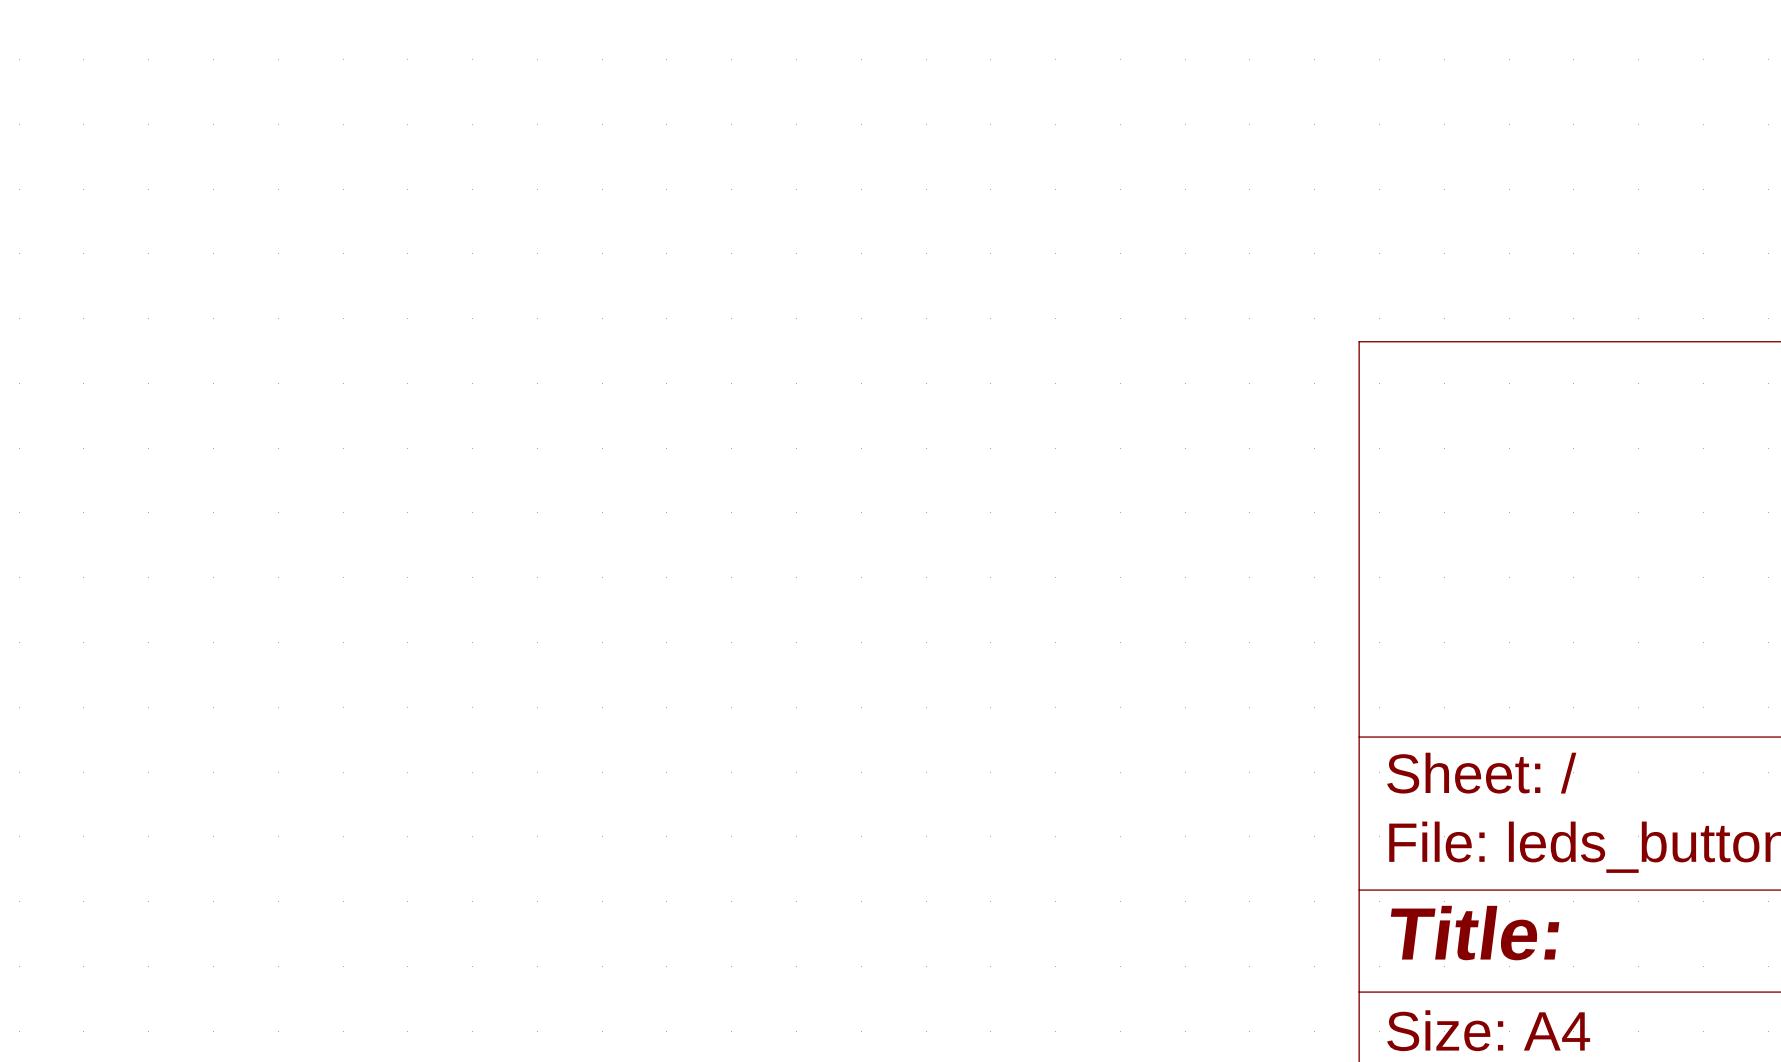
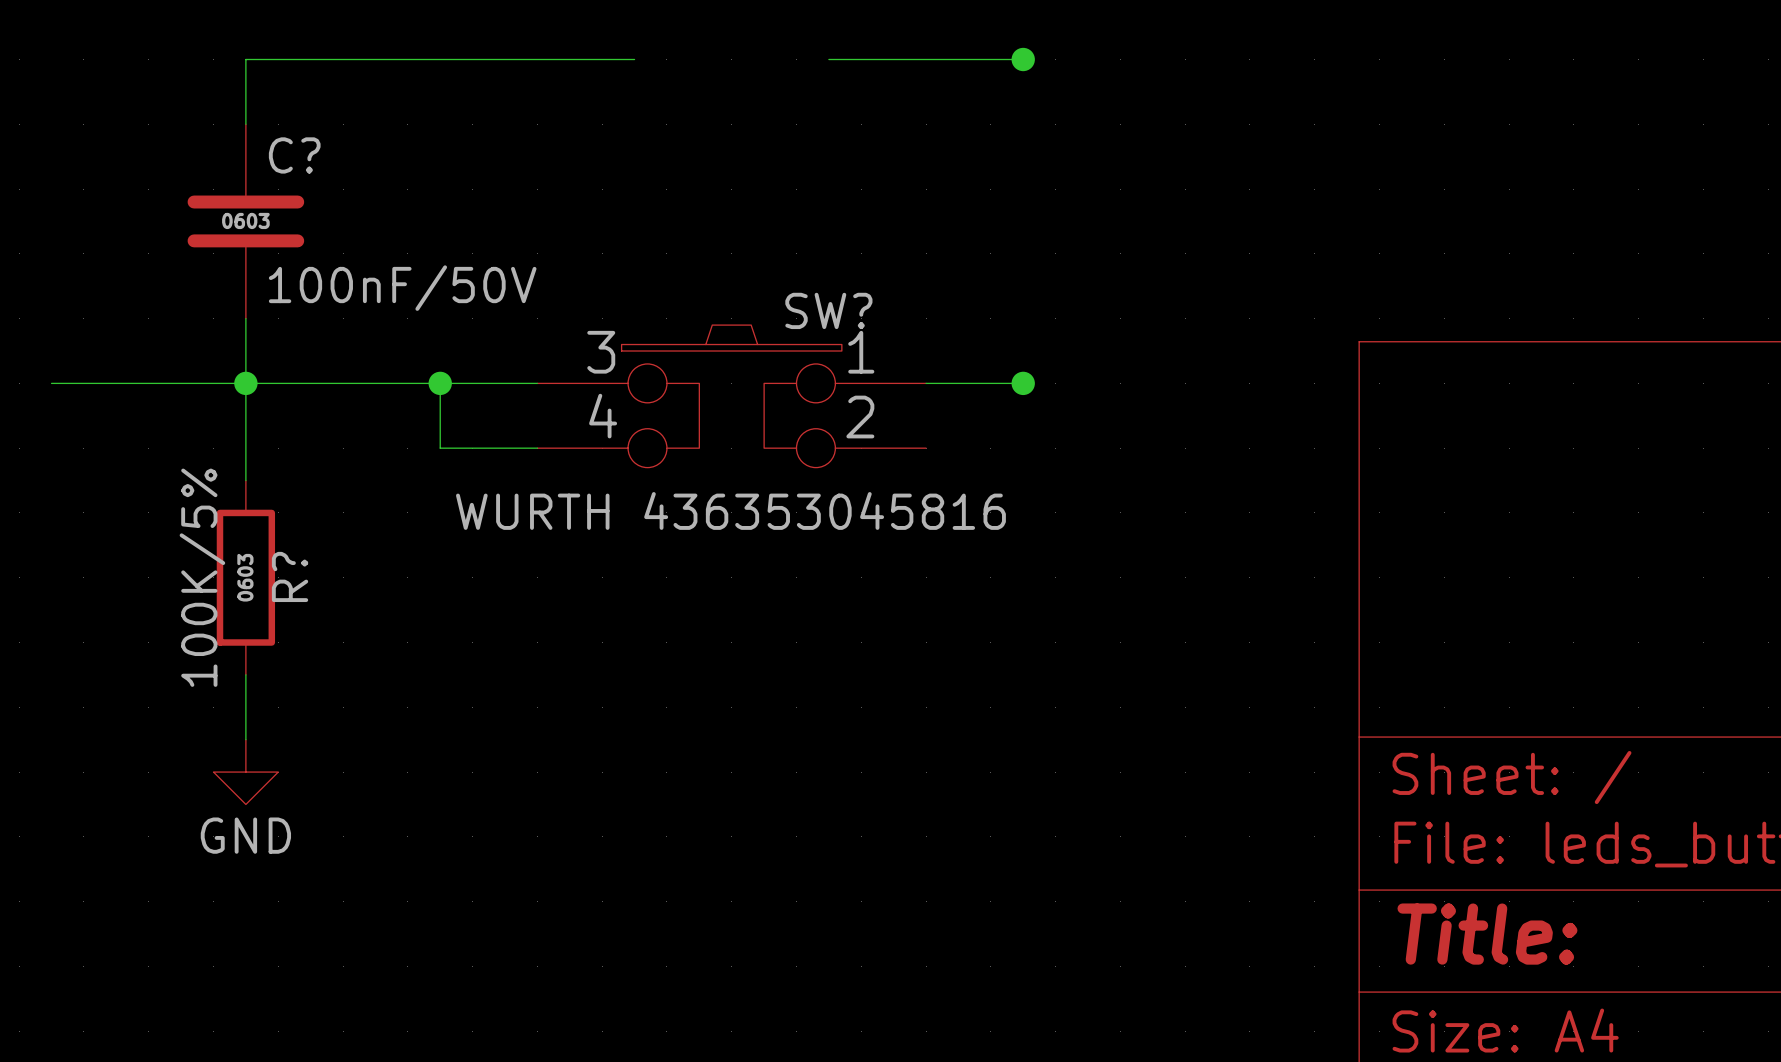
wire: none -> (634, 59) (245, 59) (245, 124)
wire: none -> (828, 59) (1023, 59)
junction: none -> (1023, 59)
C?: none -> 100nF/50V (245, 221)
wire: none -> (245, 318) (245, 480)
wire: none -> (51, 383) (537, 383)
junction: none -> (245, 383)
wire: none -> (440, 383) (440, 448) (537, 448)
junction: none -> (440, 383)
wire: none -> (926, 383) (1023, 383)
junction: none -> (1023, 383)
SW?: none -> WURTH 436353045816 (731, 396)
R?: none -> 100K/5% (245, 577)
wire: none -> (245, 674) (245, 739)
power symbol: none -> GND (245, 772)

